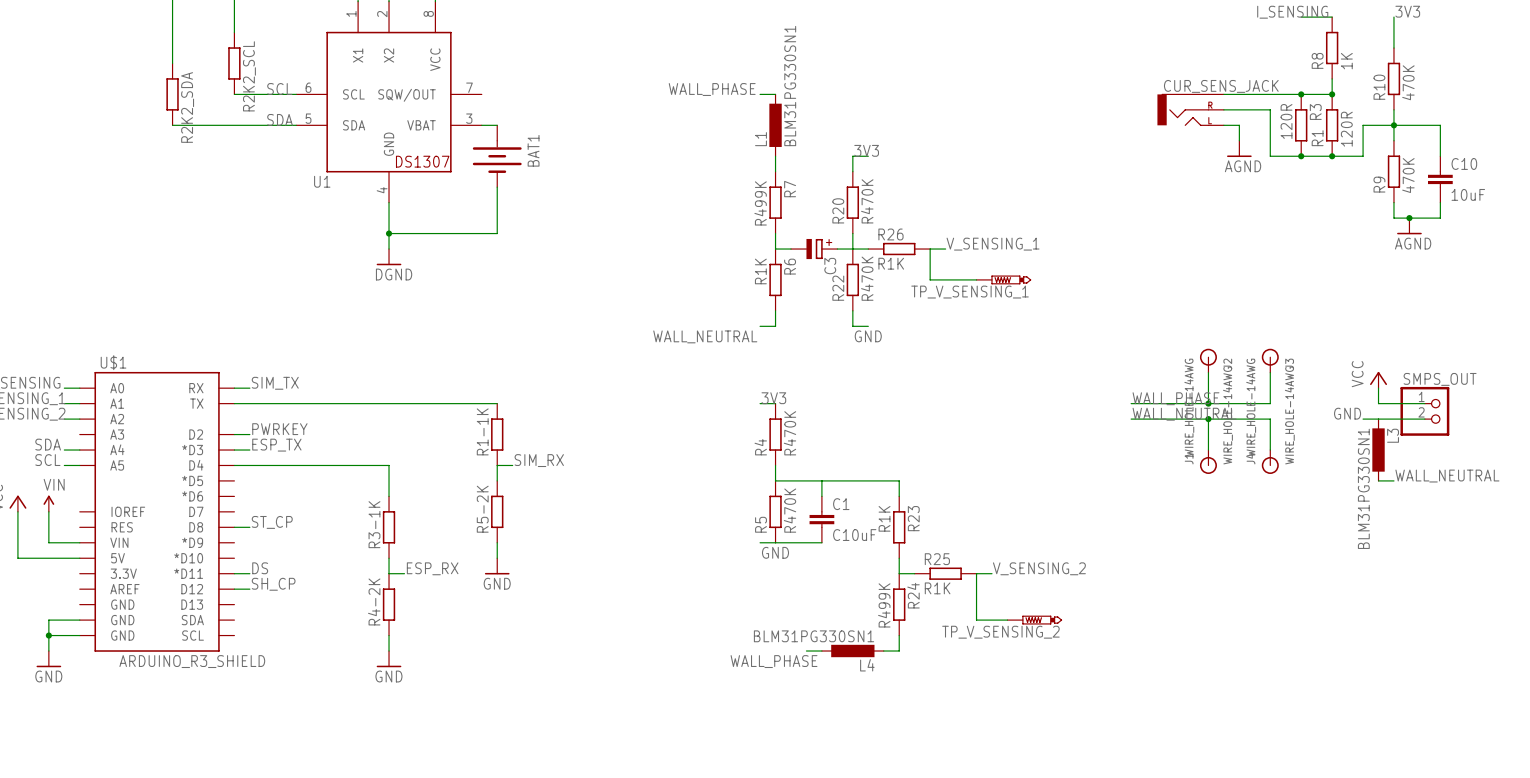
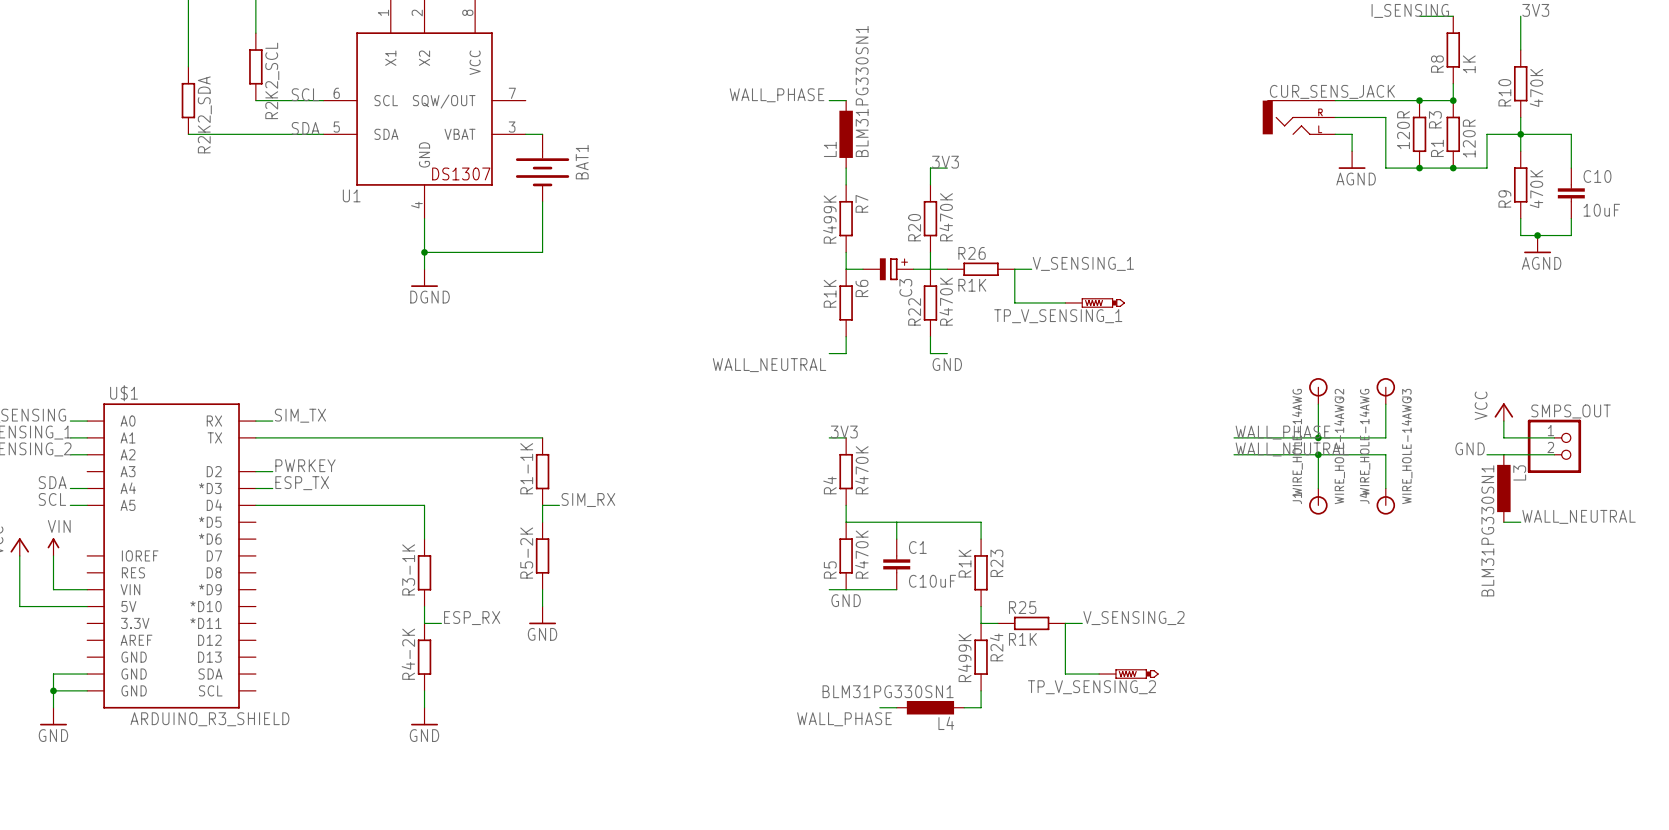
label: ST_CP (272, 522) -> none
wire: (234, 527) (249, 527) -> none
label: DS (260, 568) -> none
wire: (234, 573) (249, 573) -> none
label: SH_CP (273, 584) -> none
wire: (234, 589) (249, 589) -> none

